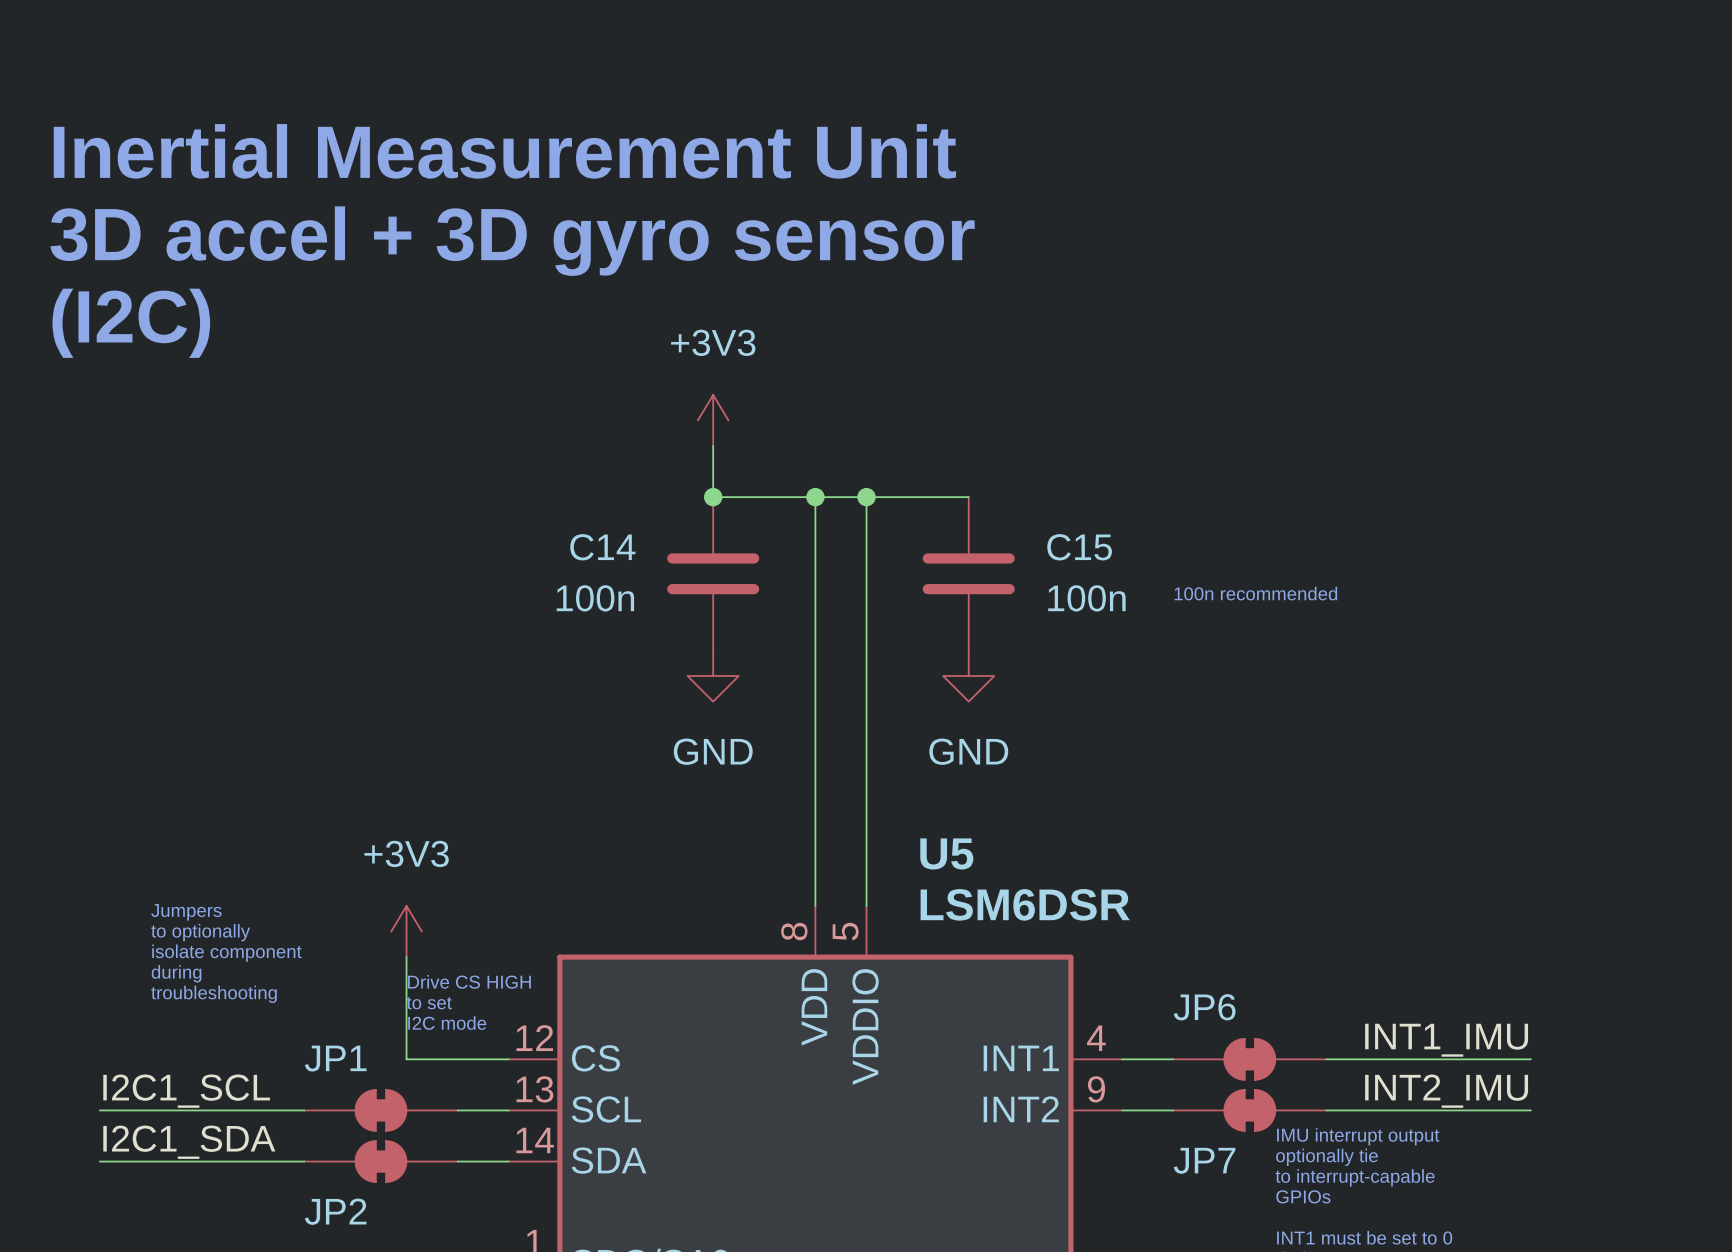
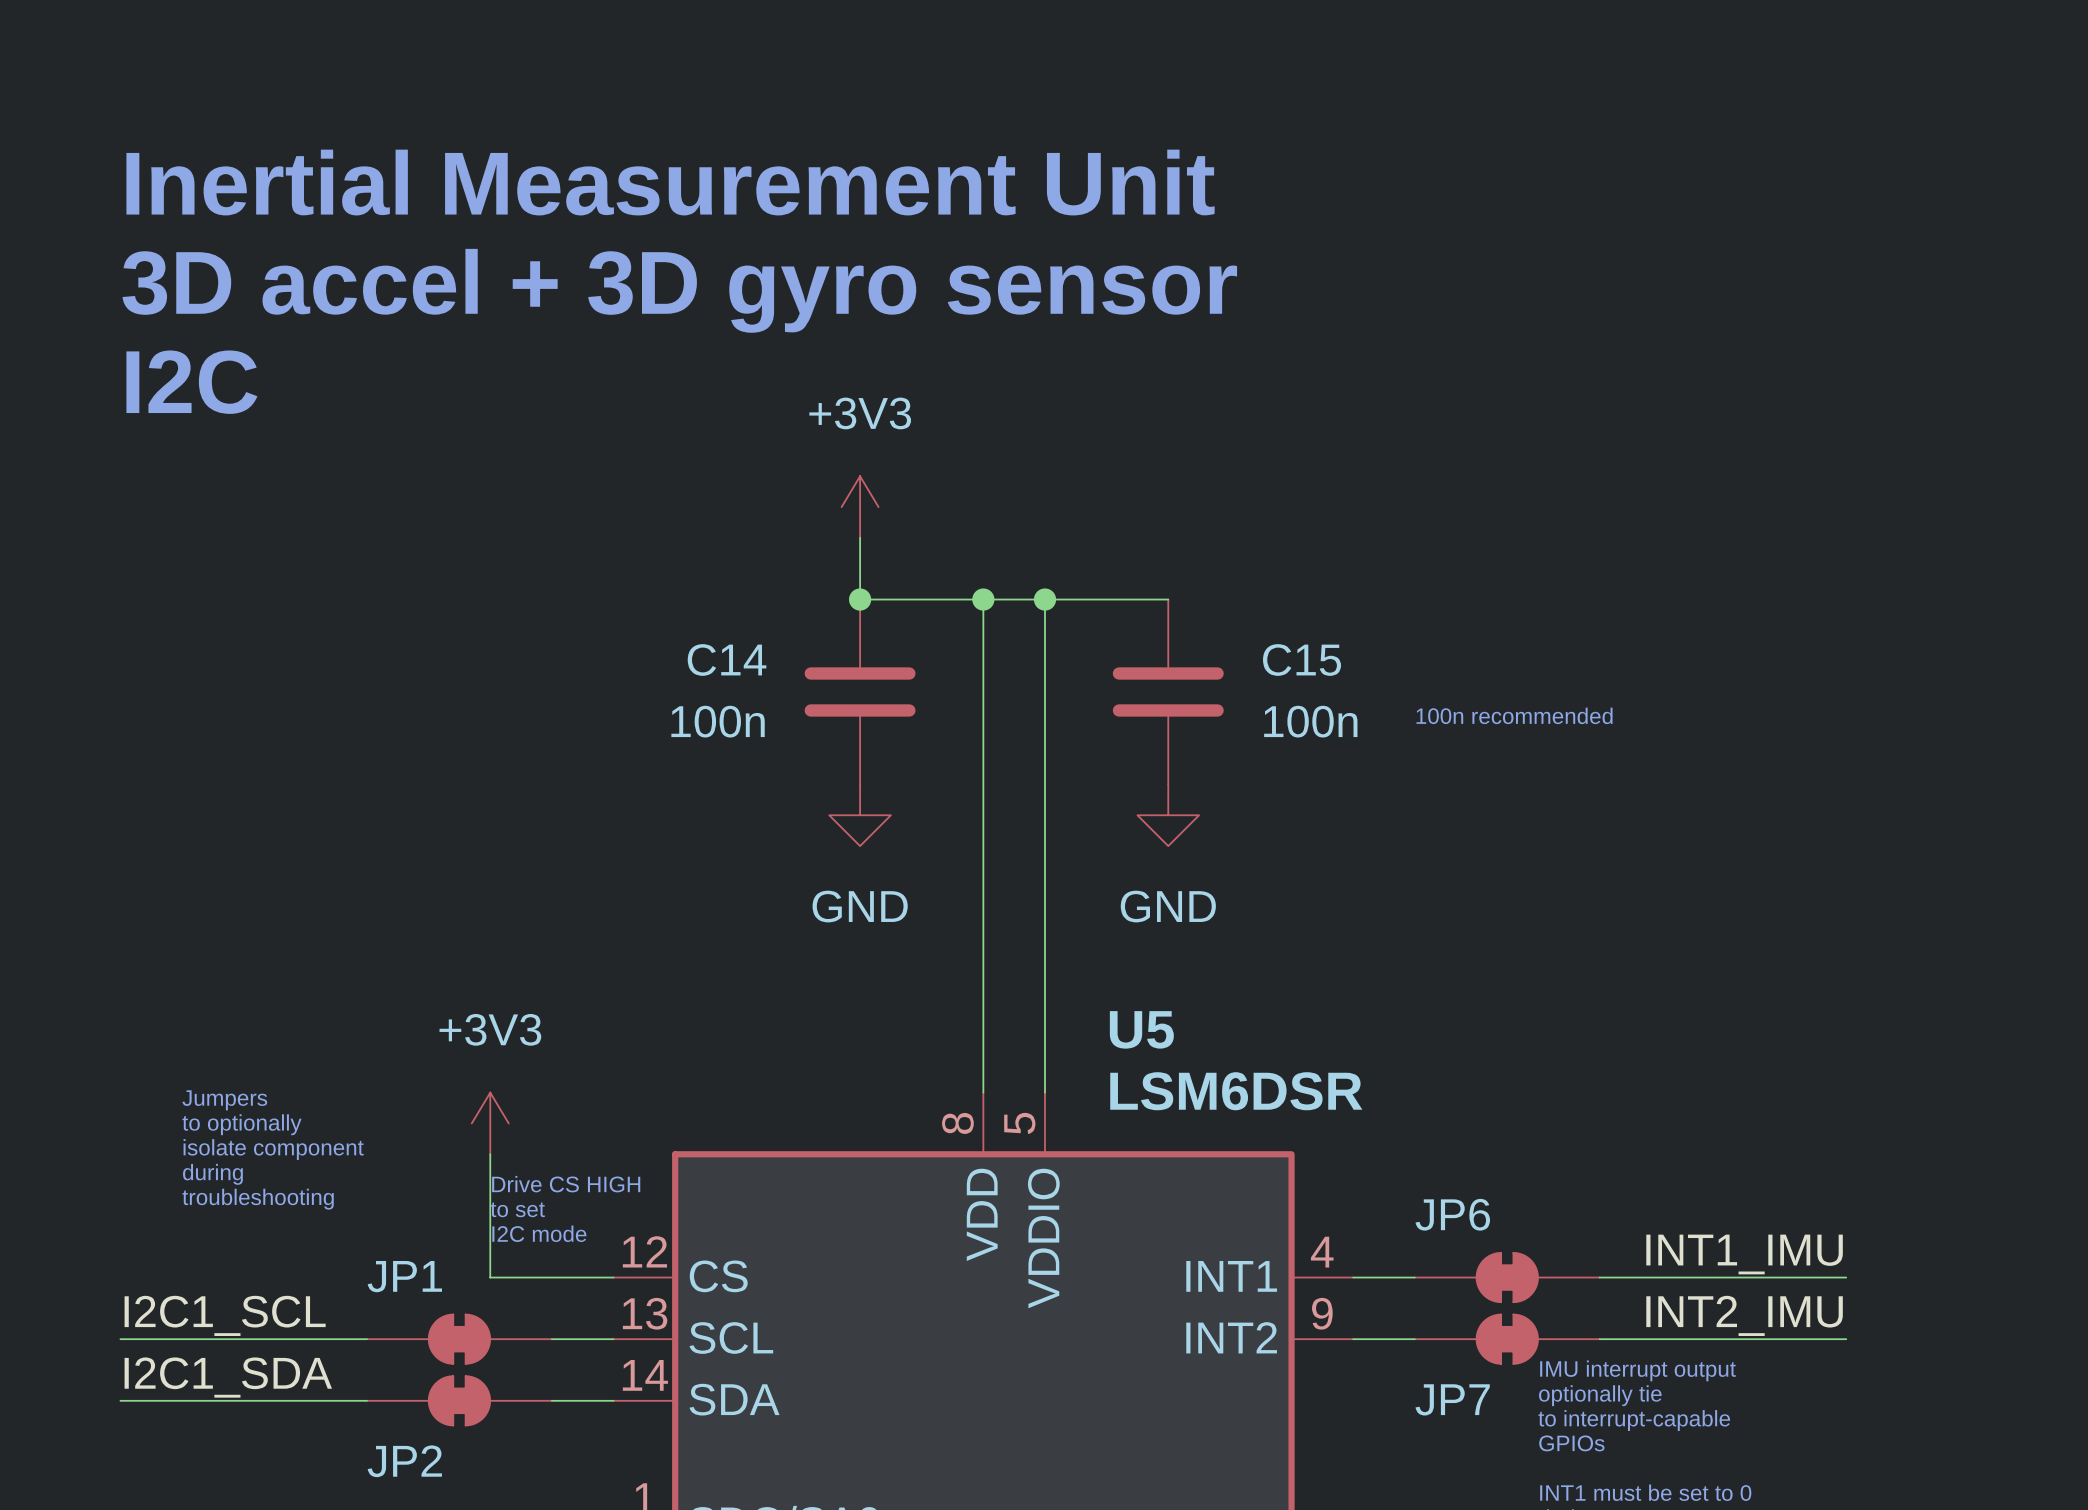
text position: Inertial Measurement Unit (504, 151) -> Inertial Measurement Unit (670, 182)
text position: 3D accel + 3D gyro sensor (512, 241) -> 3D accel + 3D gyro sensor (679, 290)
text: (I2C) (131, 323) -> I2C (191, 382)

